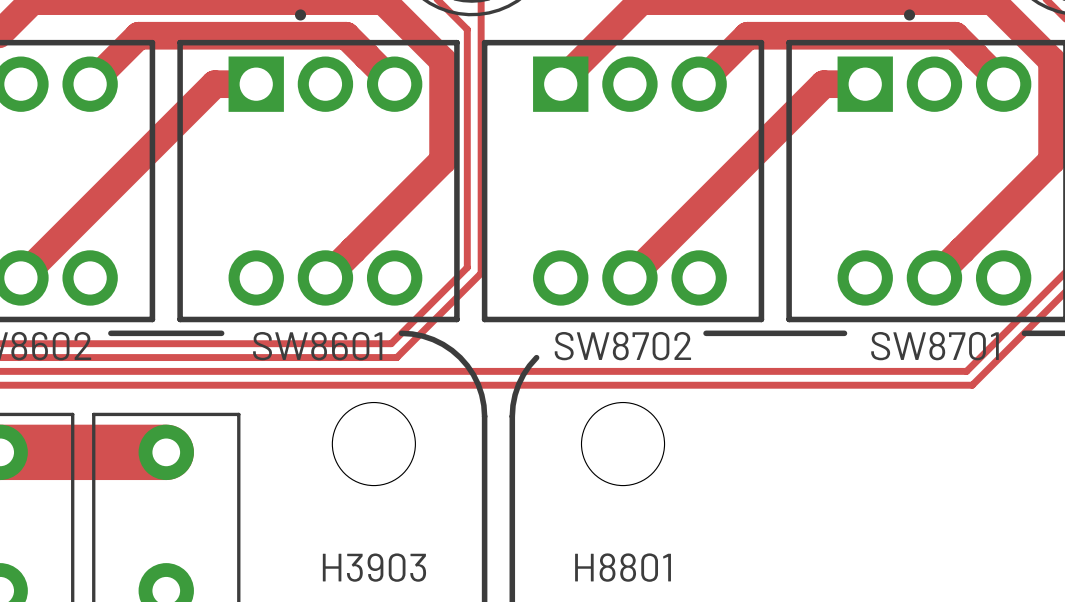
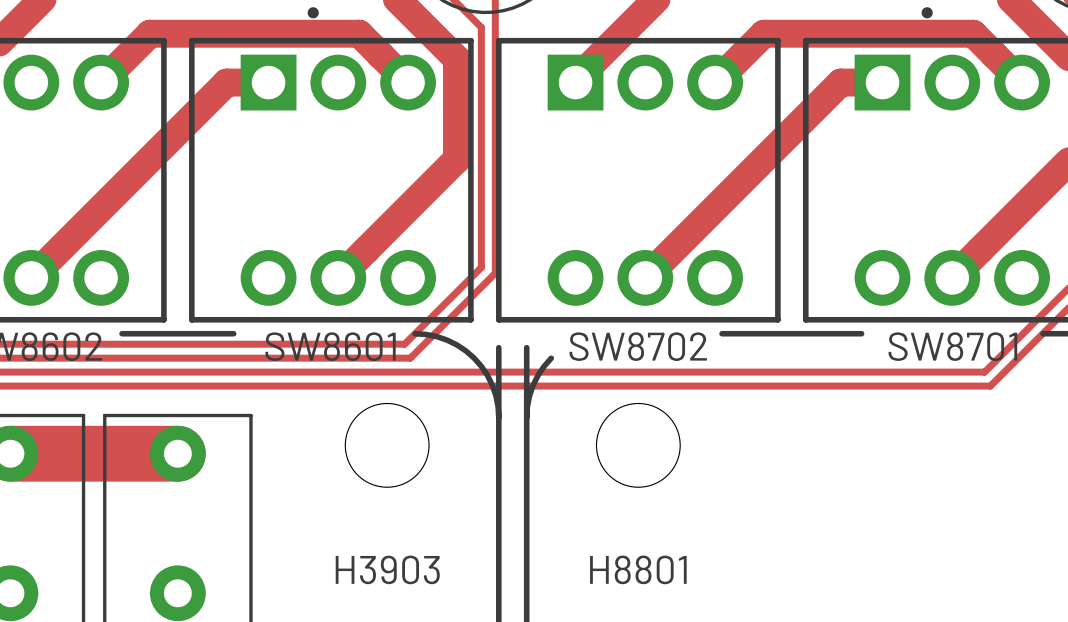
line: none -> (498, 347) (498, 417)
line: none -> (526, 347) (526, 417)

